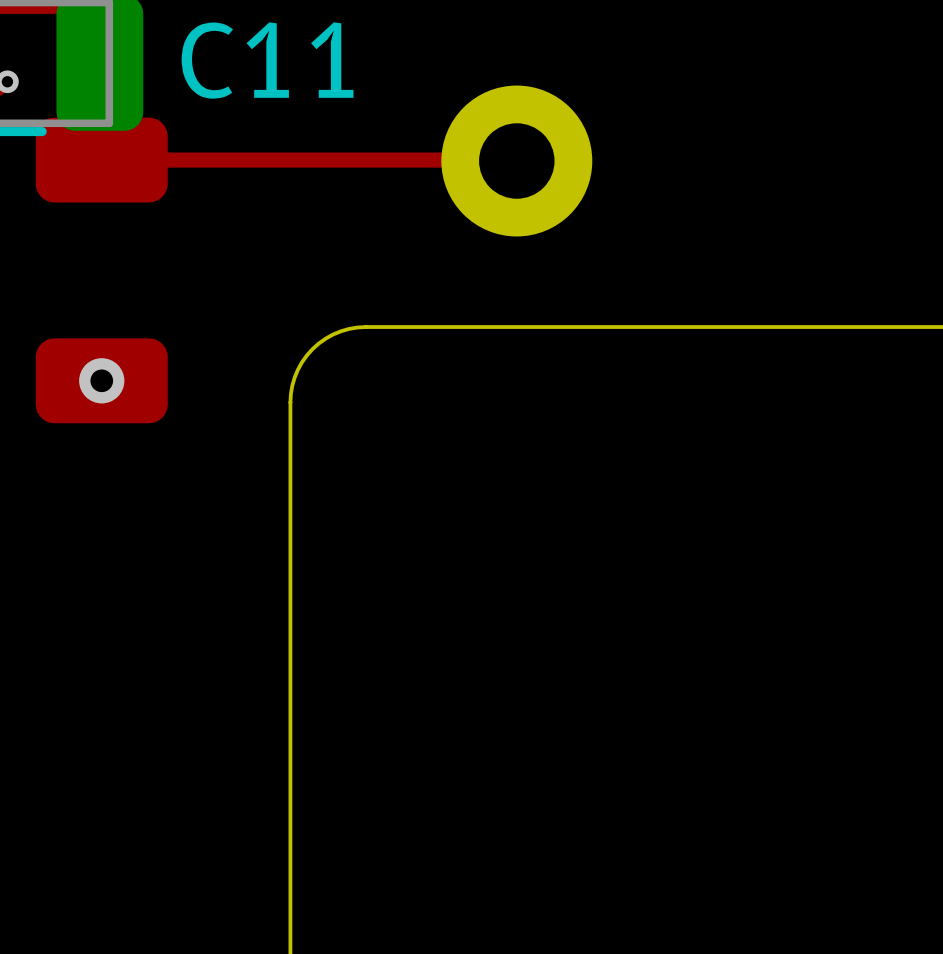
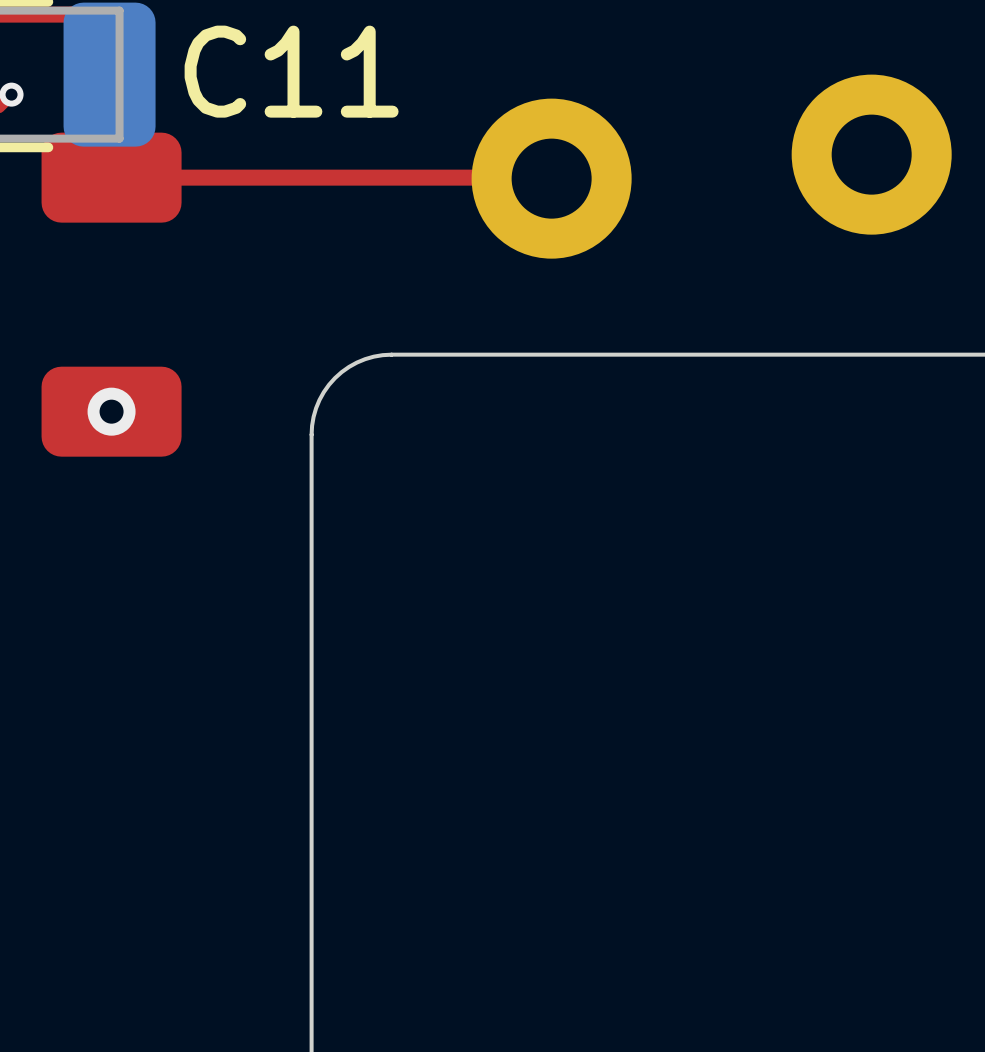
part: none -> (871, 154)

